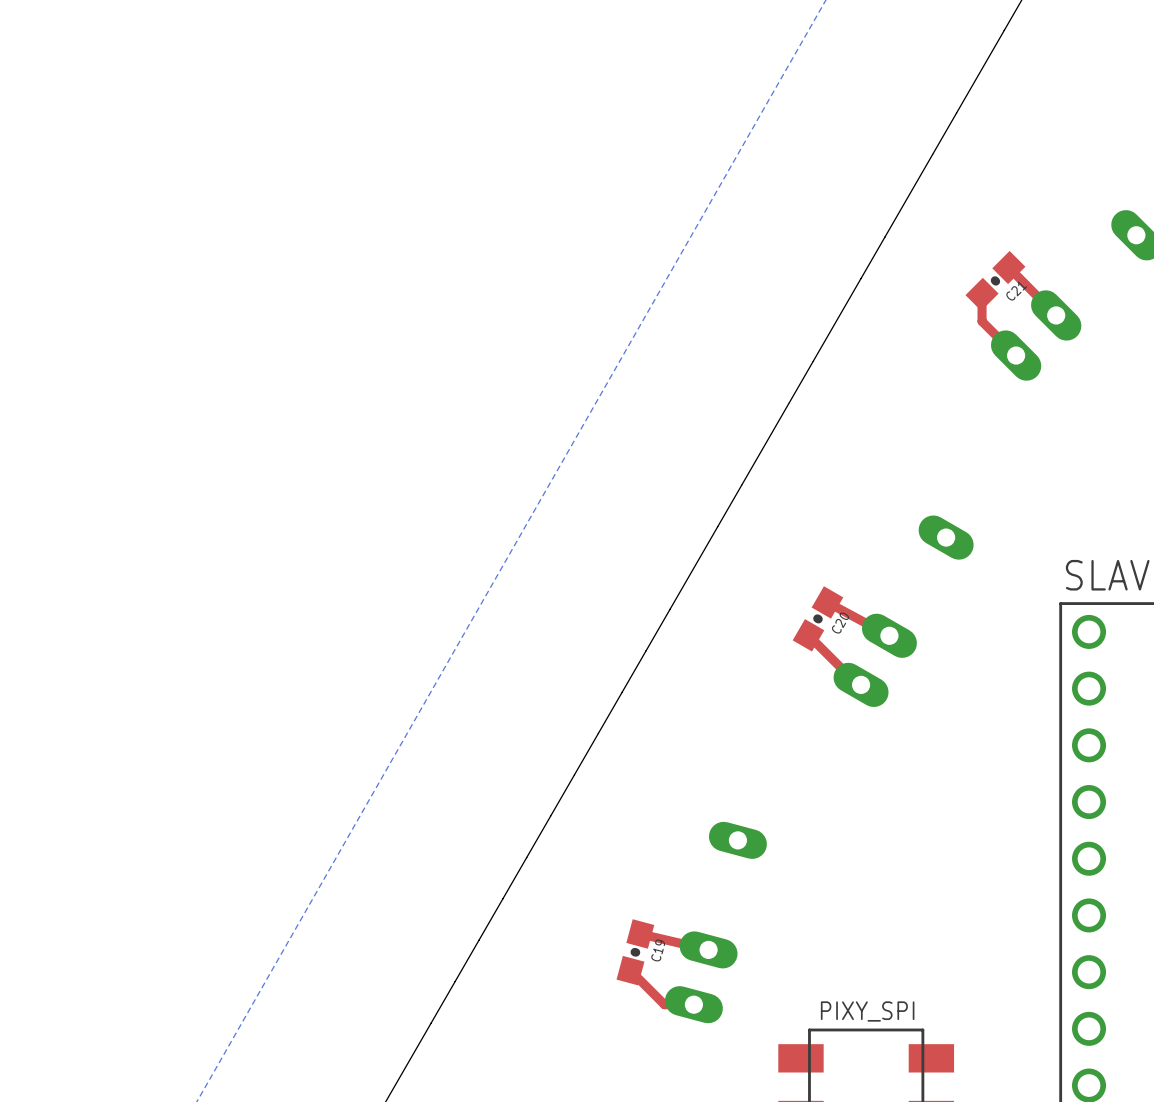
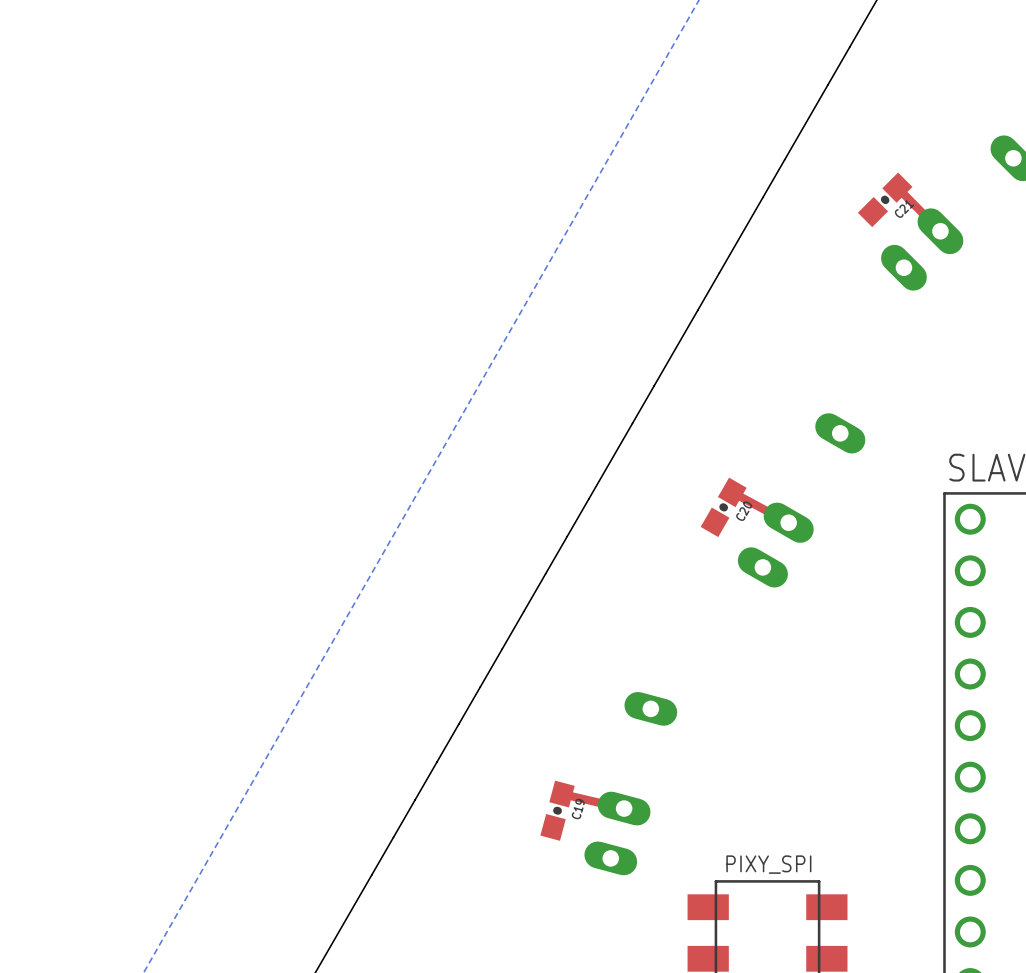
top track: (982, 294) (982, 321) (1016, 355) -> none
top track: (808, 635) (858, 684) (861, 684) -> none
top track: (630, 970) (664, 1004) (693, 1004) -> none

